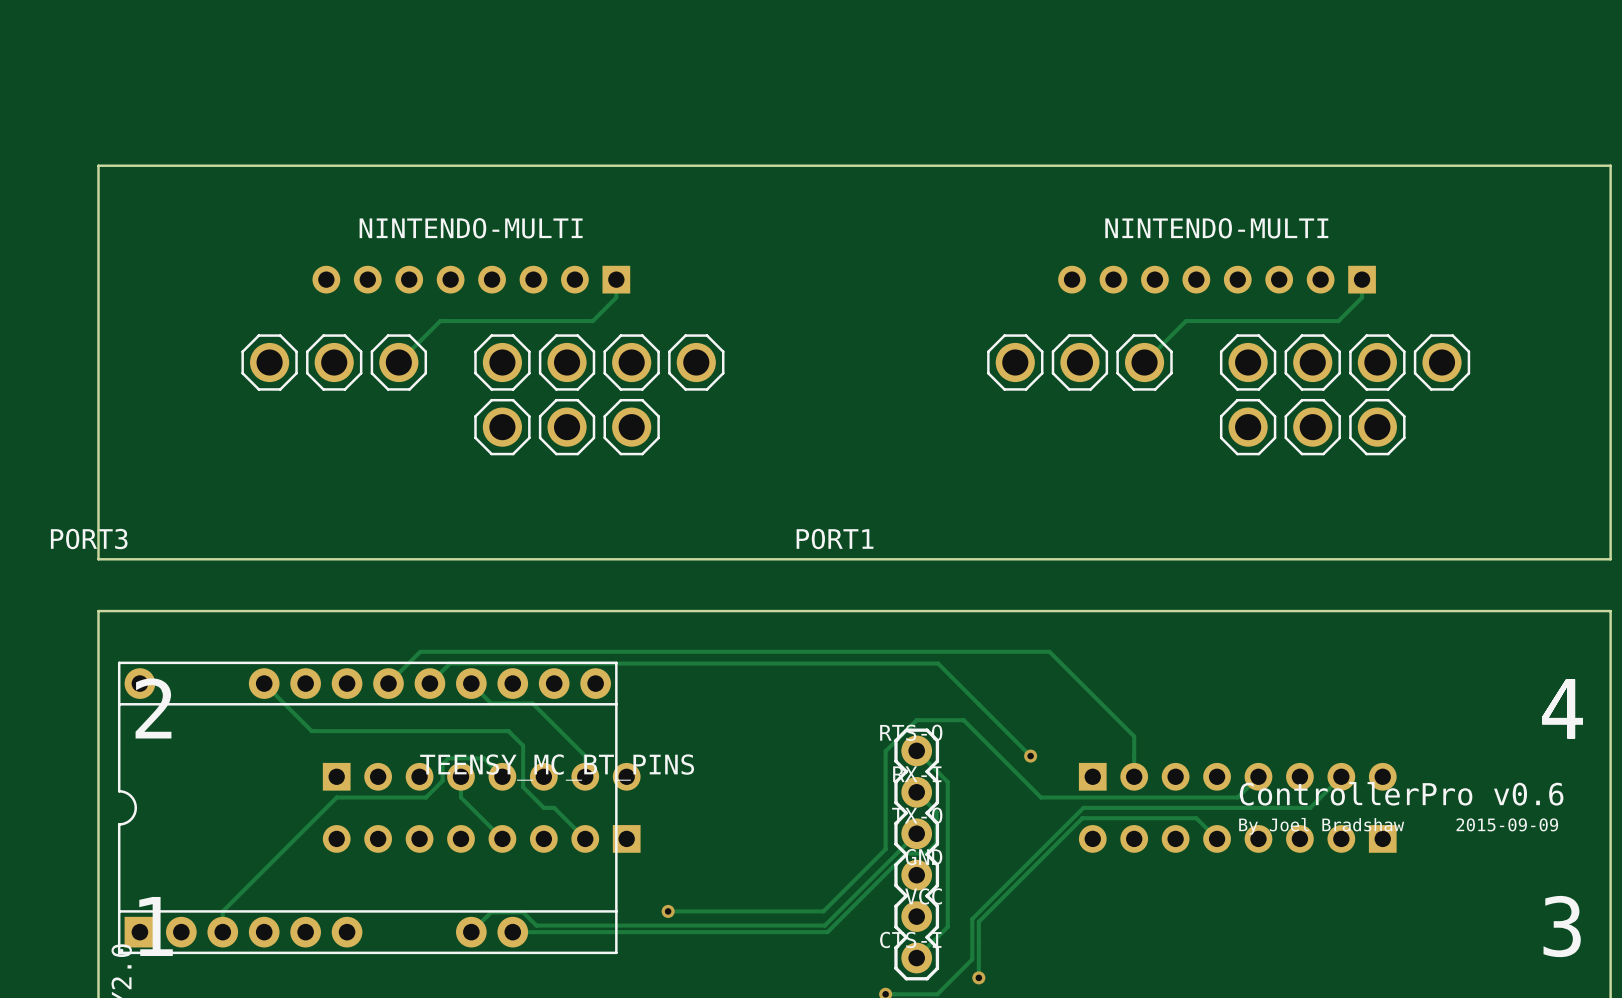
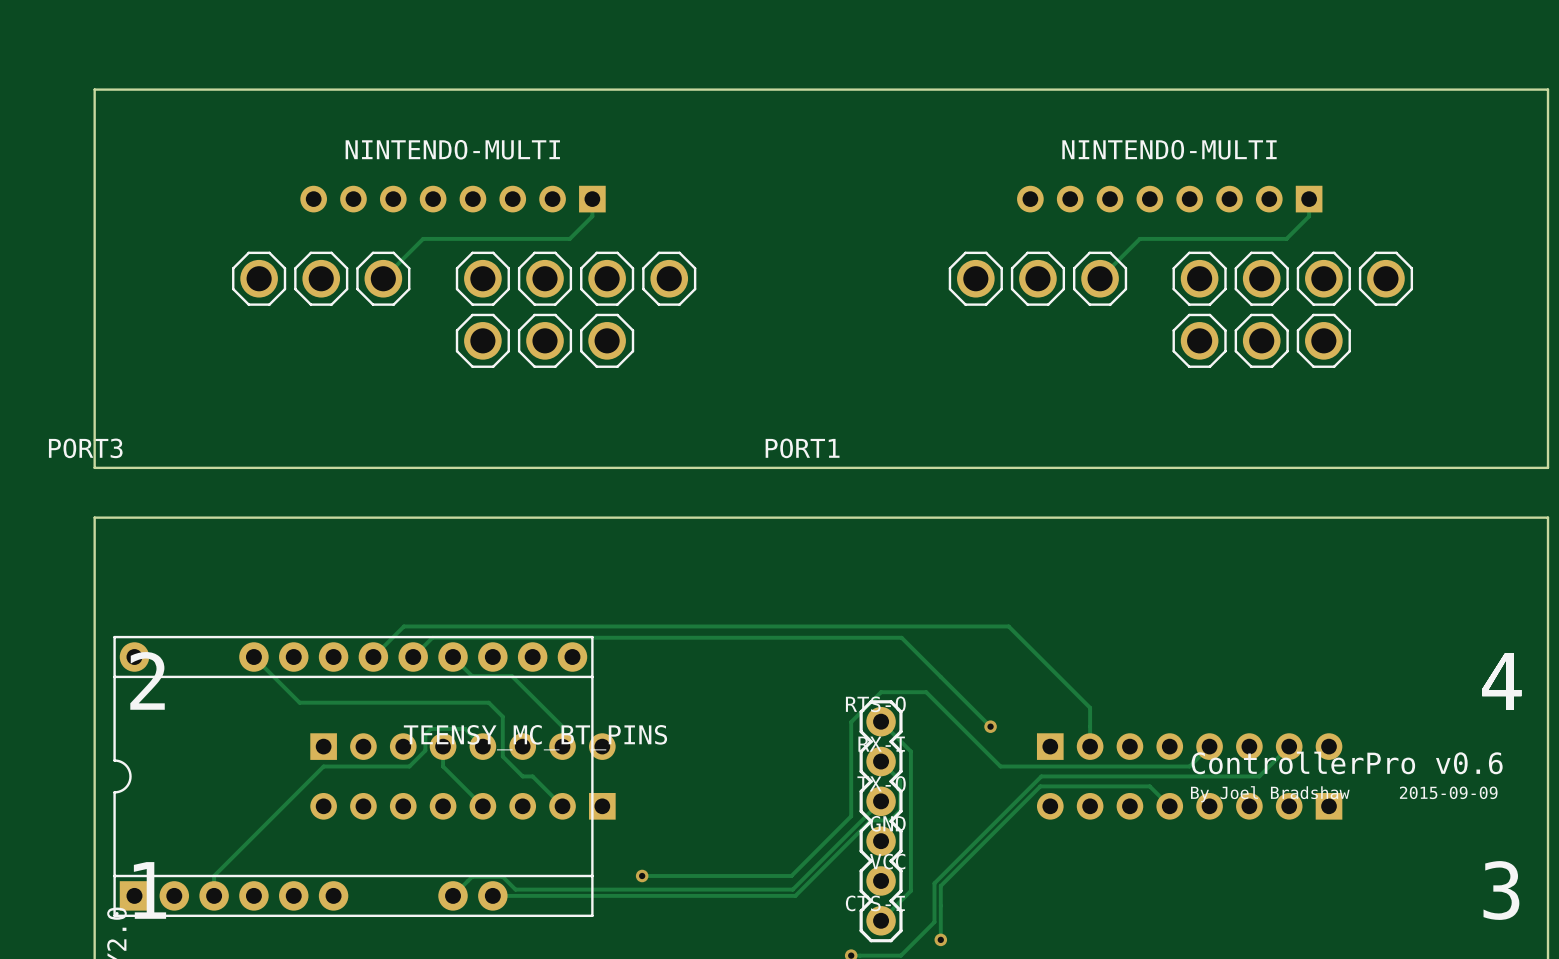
board edge: (98, 165) (1610, 165) -> (94, 159) (94, 89) (1548, 89) (1548, 159)
part position: (471, 279) -> (453, 199)
track: (616, 279) (616, 297) (592, 321) (440, 321) (398, 362) -> (592, 199) (592, 216) (569, 238) (423, 238) (383, 278)
part position: (1217, 279) -> (1169, 199)
track: (1362, 279) (1362, 297) (1338, 321) (1185, 321) (1144, 362) -> (1309, 199) (1309, 216) (1286, 238) (1139, 238) (1100, 278)
PORT3 position: (482, 394) -> (464, 309)
PORT1 position: (1228, 394) -> (1180, 309)
board edge: (98, 486) (98, 538) -> (94, 467) (1548, 467)
board edge: (1610, 486) (1610, 538) -> (94, 517) (1548, 517)
board edge: (98, 559) (1610, 559) -> (94, 537) (94, 587)
board edge: (98, 611) (1610, 611) -> (1548, 537) (1548, 587)

